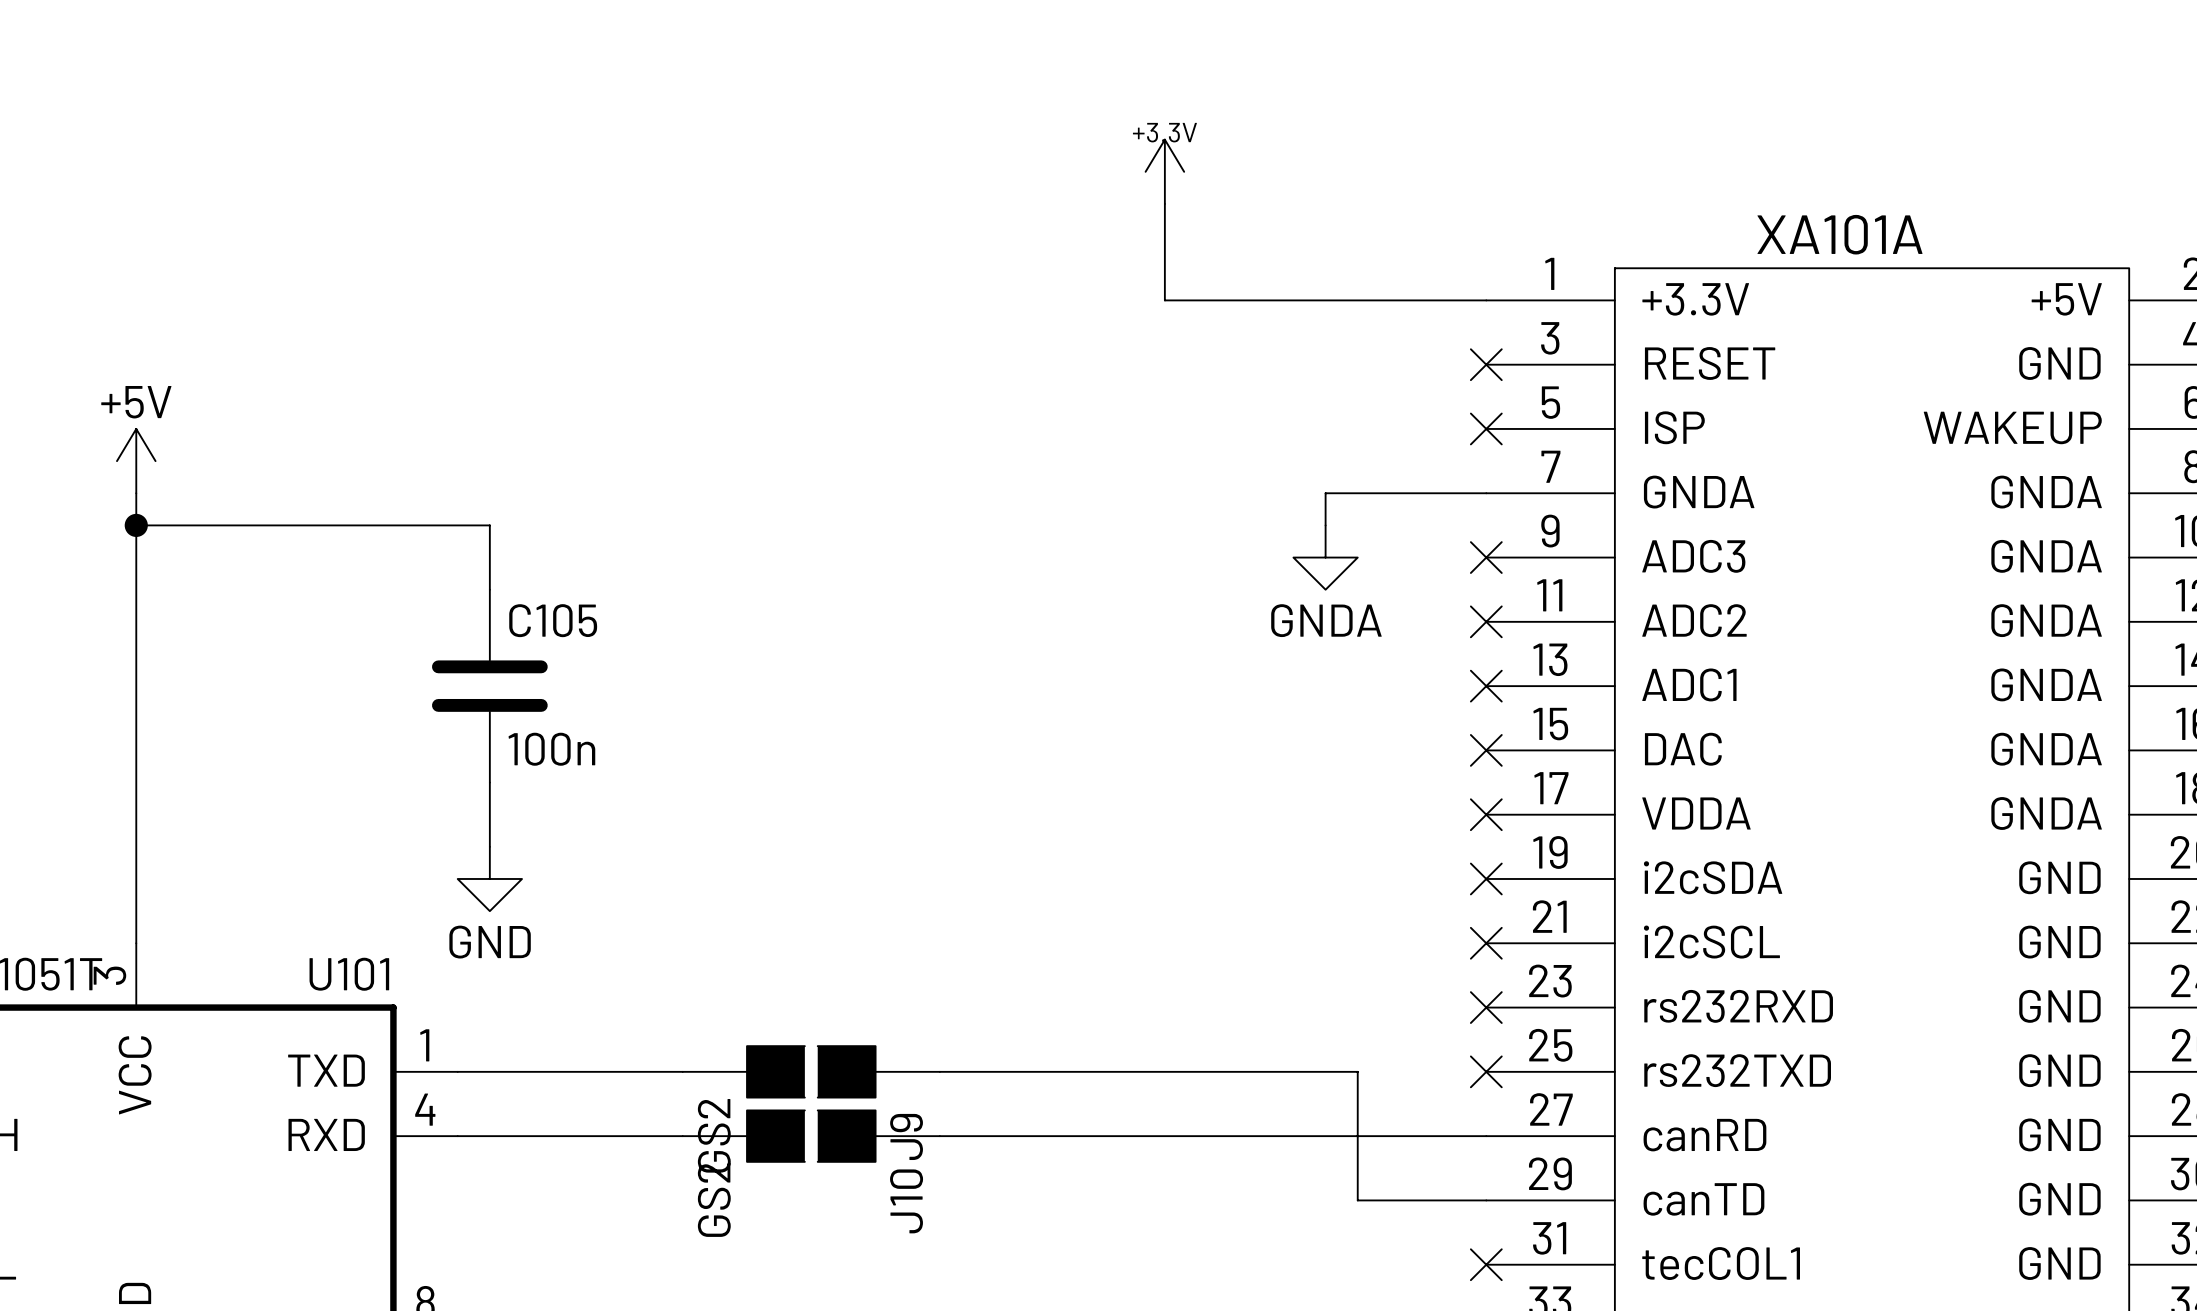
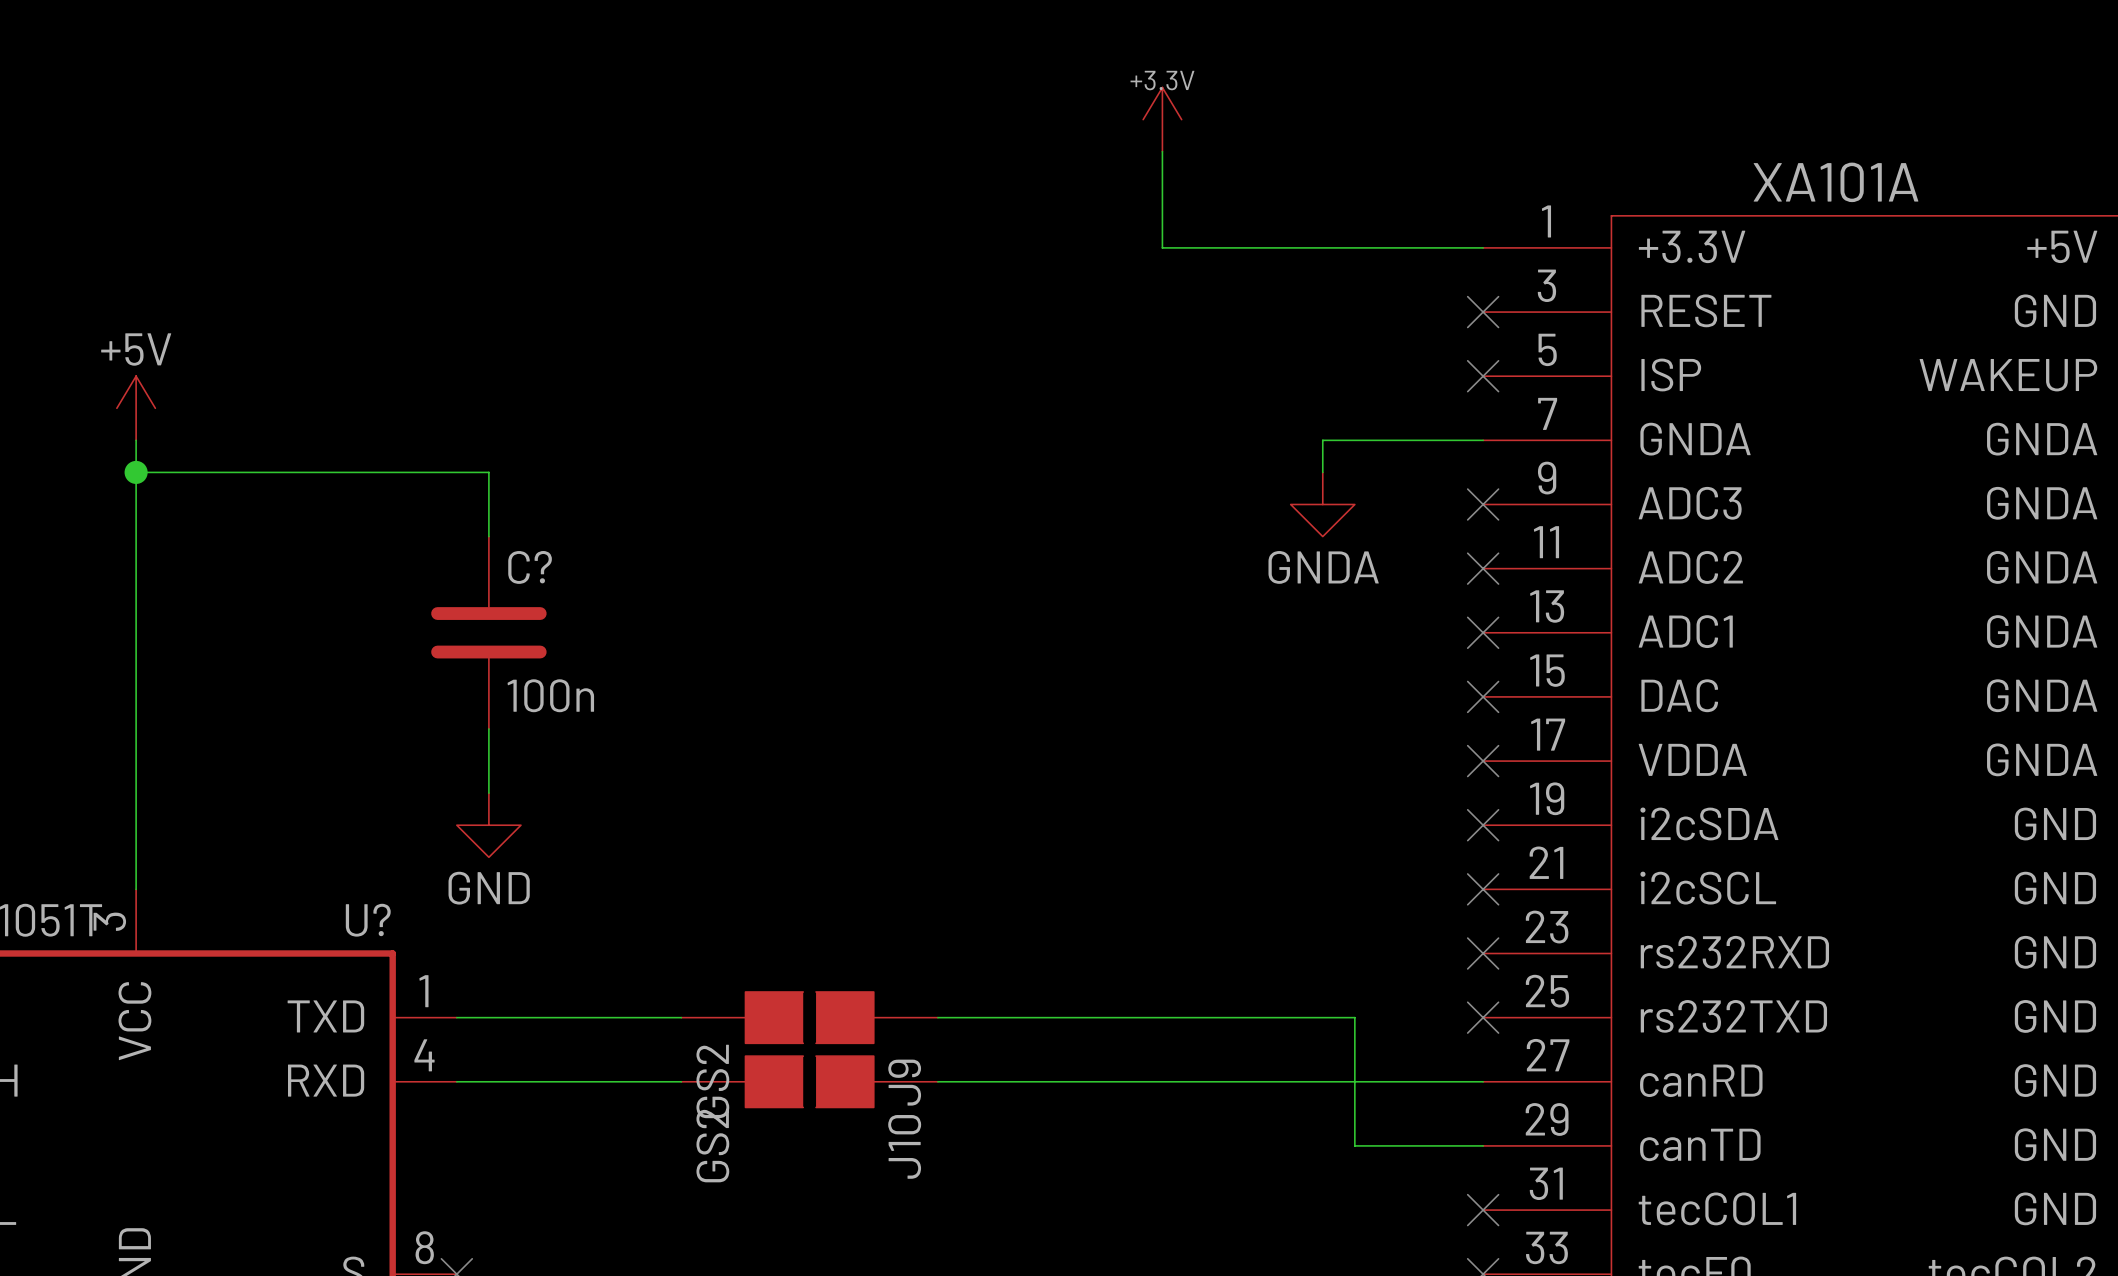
C105 name: C105 (553, 620) -> C? (530, 567)
U101 name: U101 (349, 974) -> U? (368, 920)

